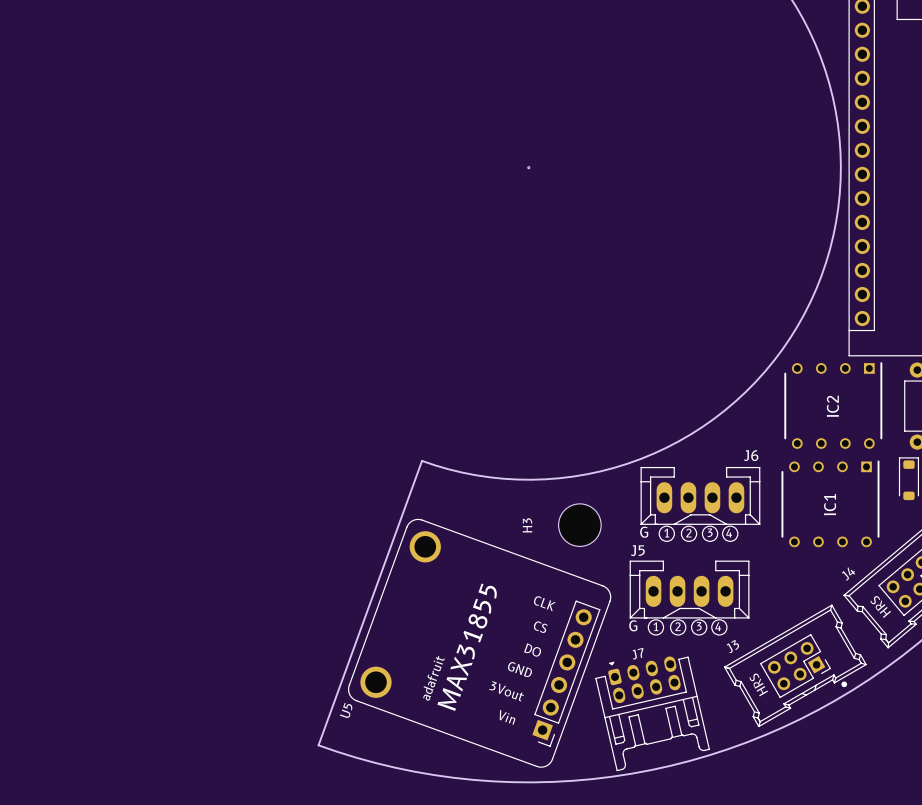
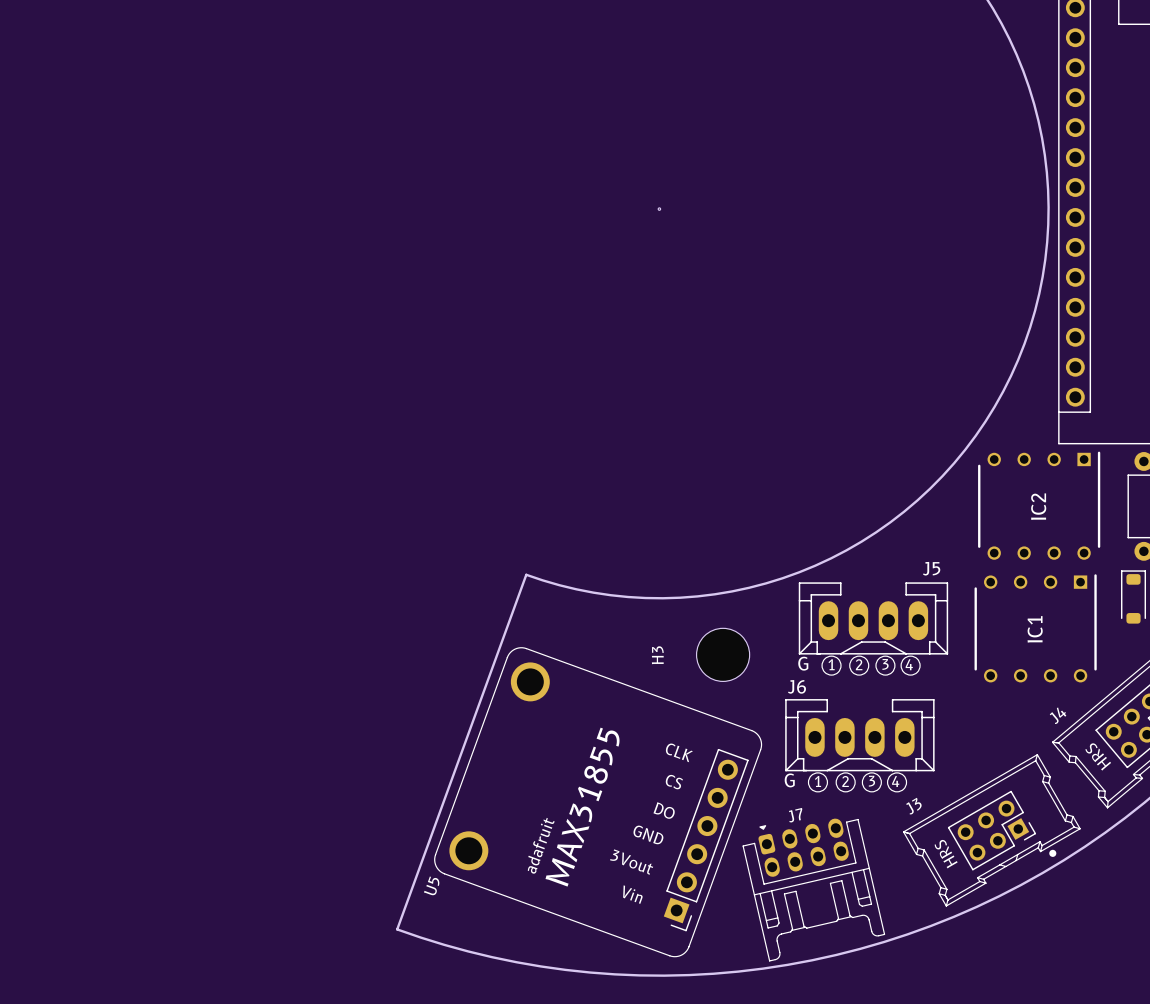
J6 name: J6 (751, 455) -> J5 (931, 568)
J5 name: J5 (637, 550) -> J6 (796, 686)

